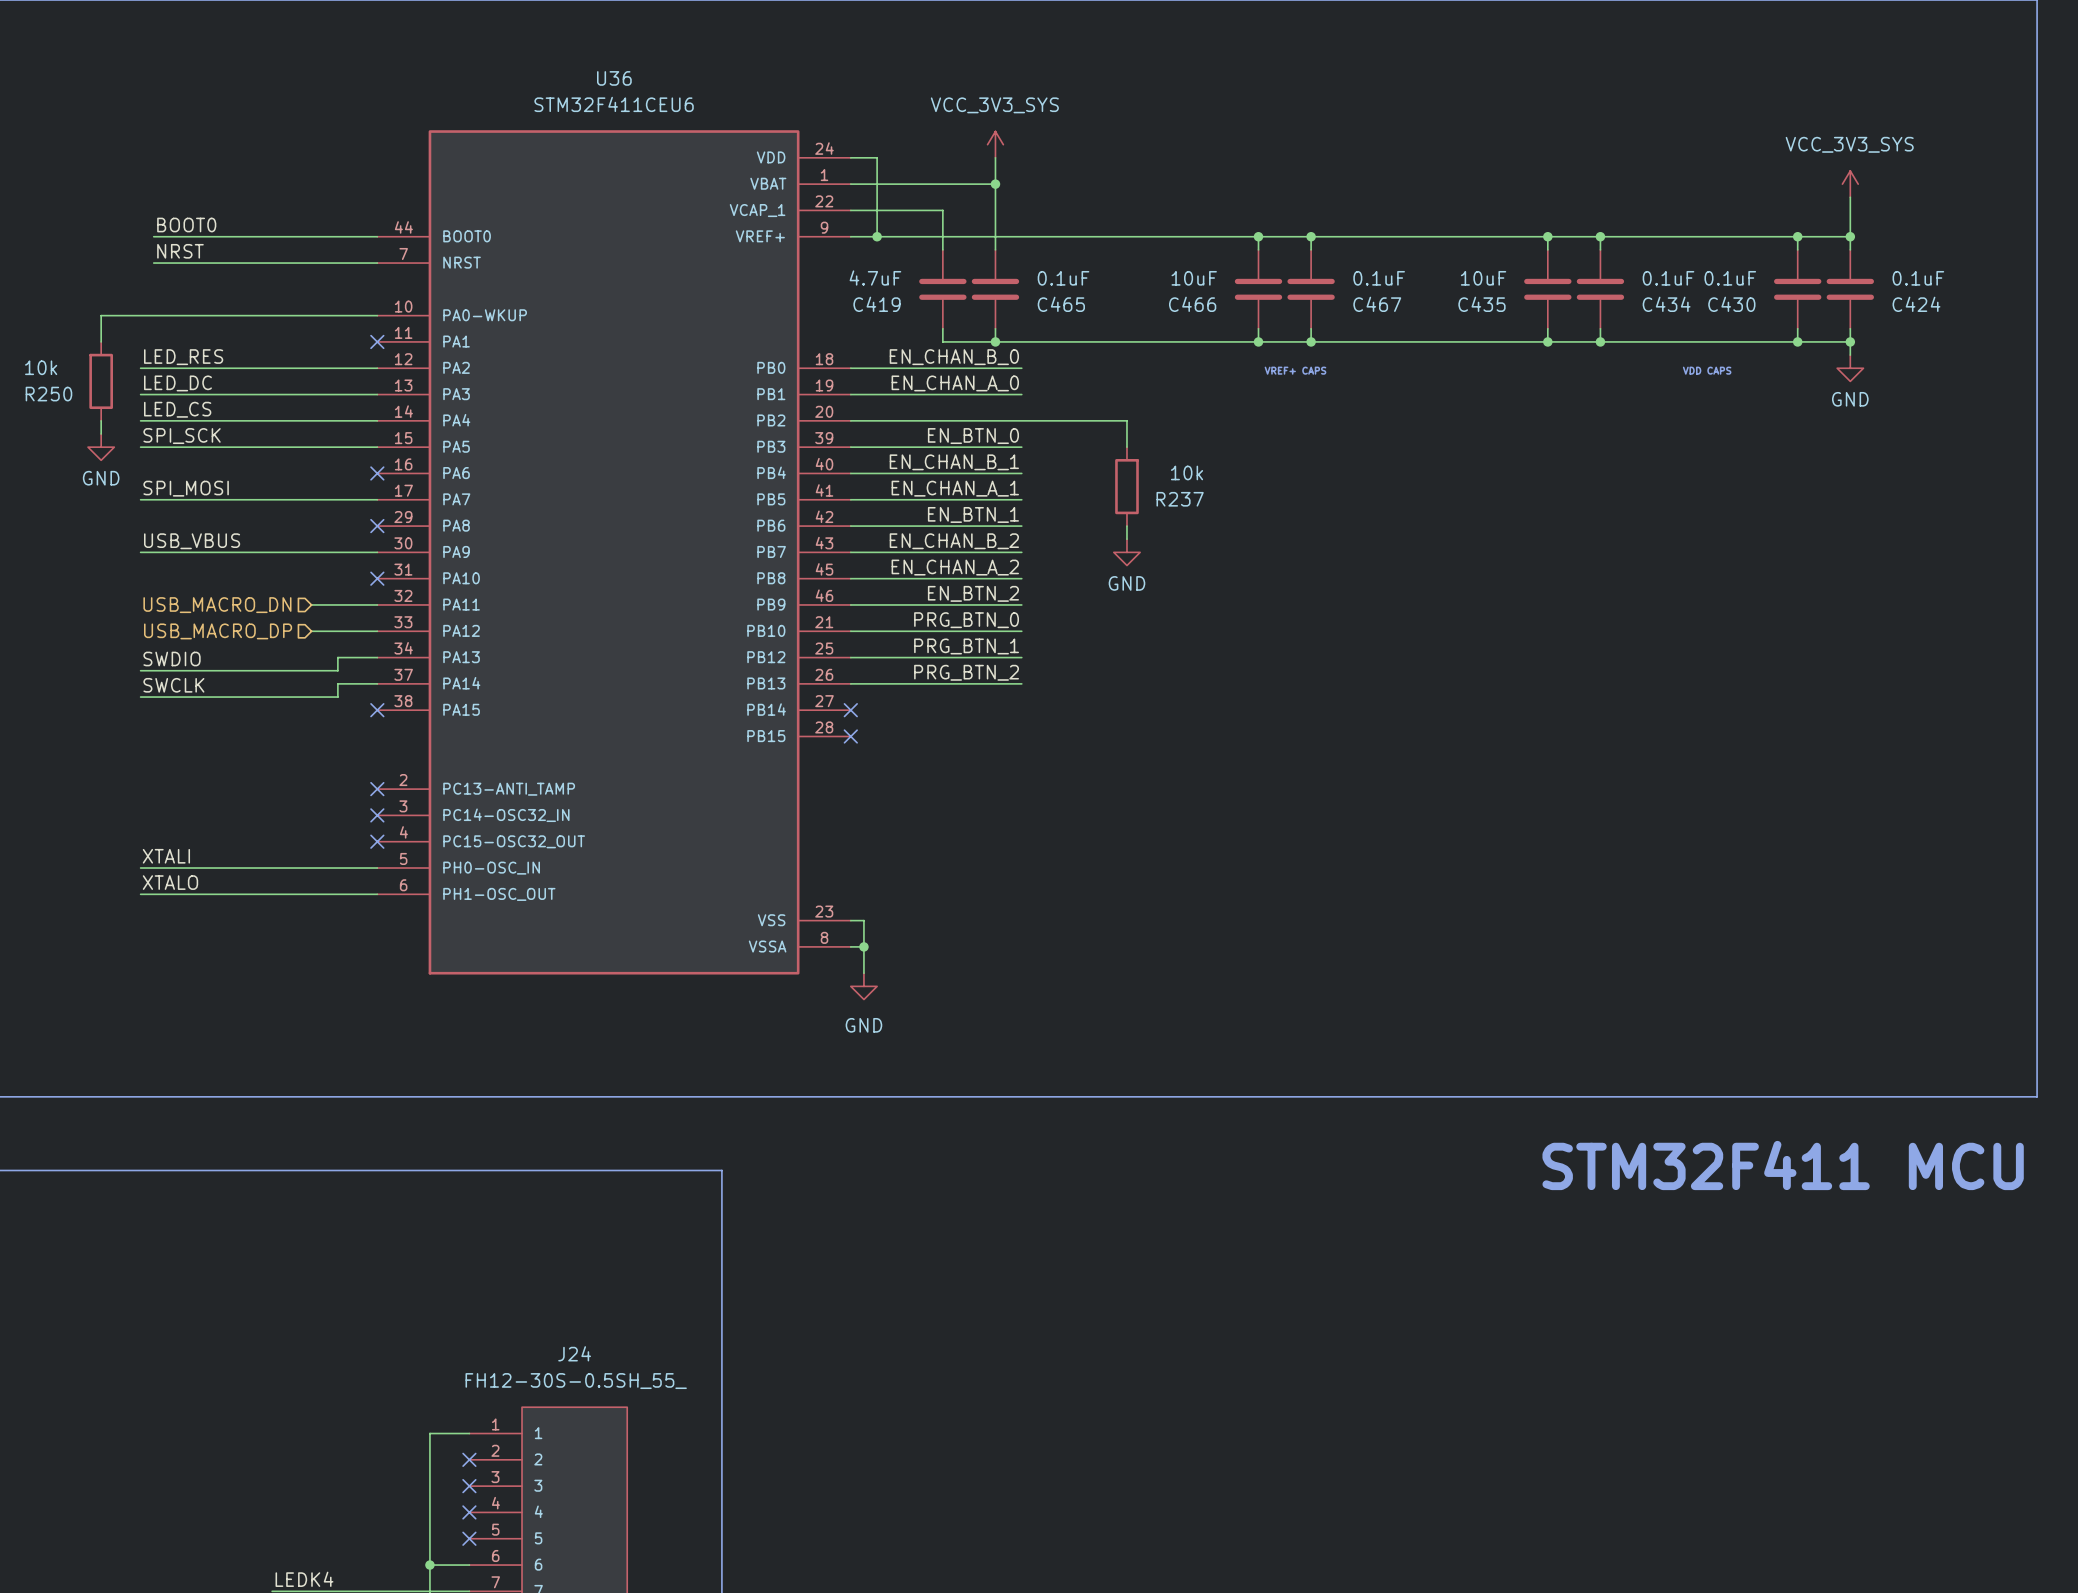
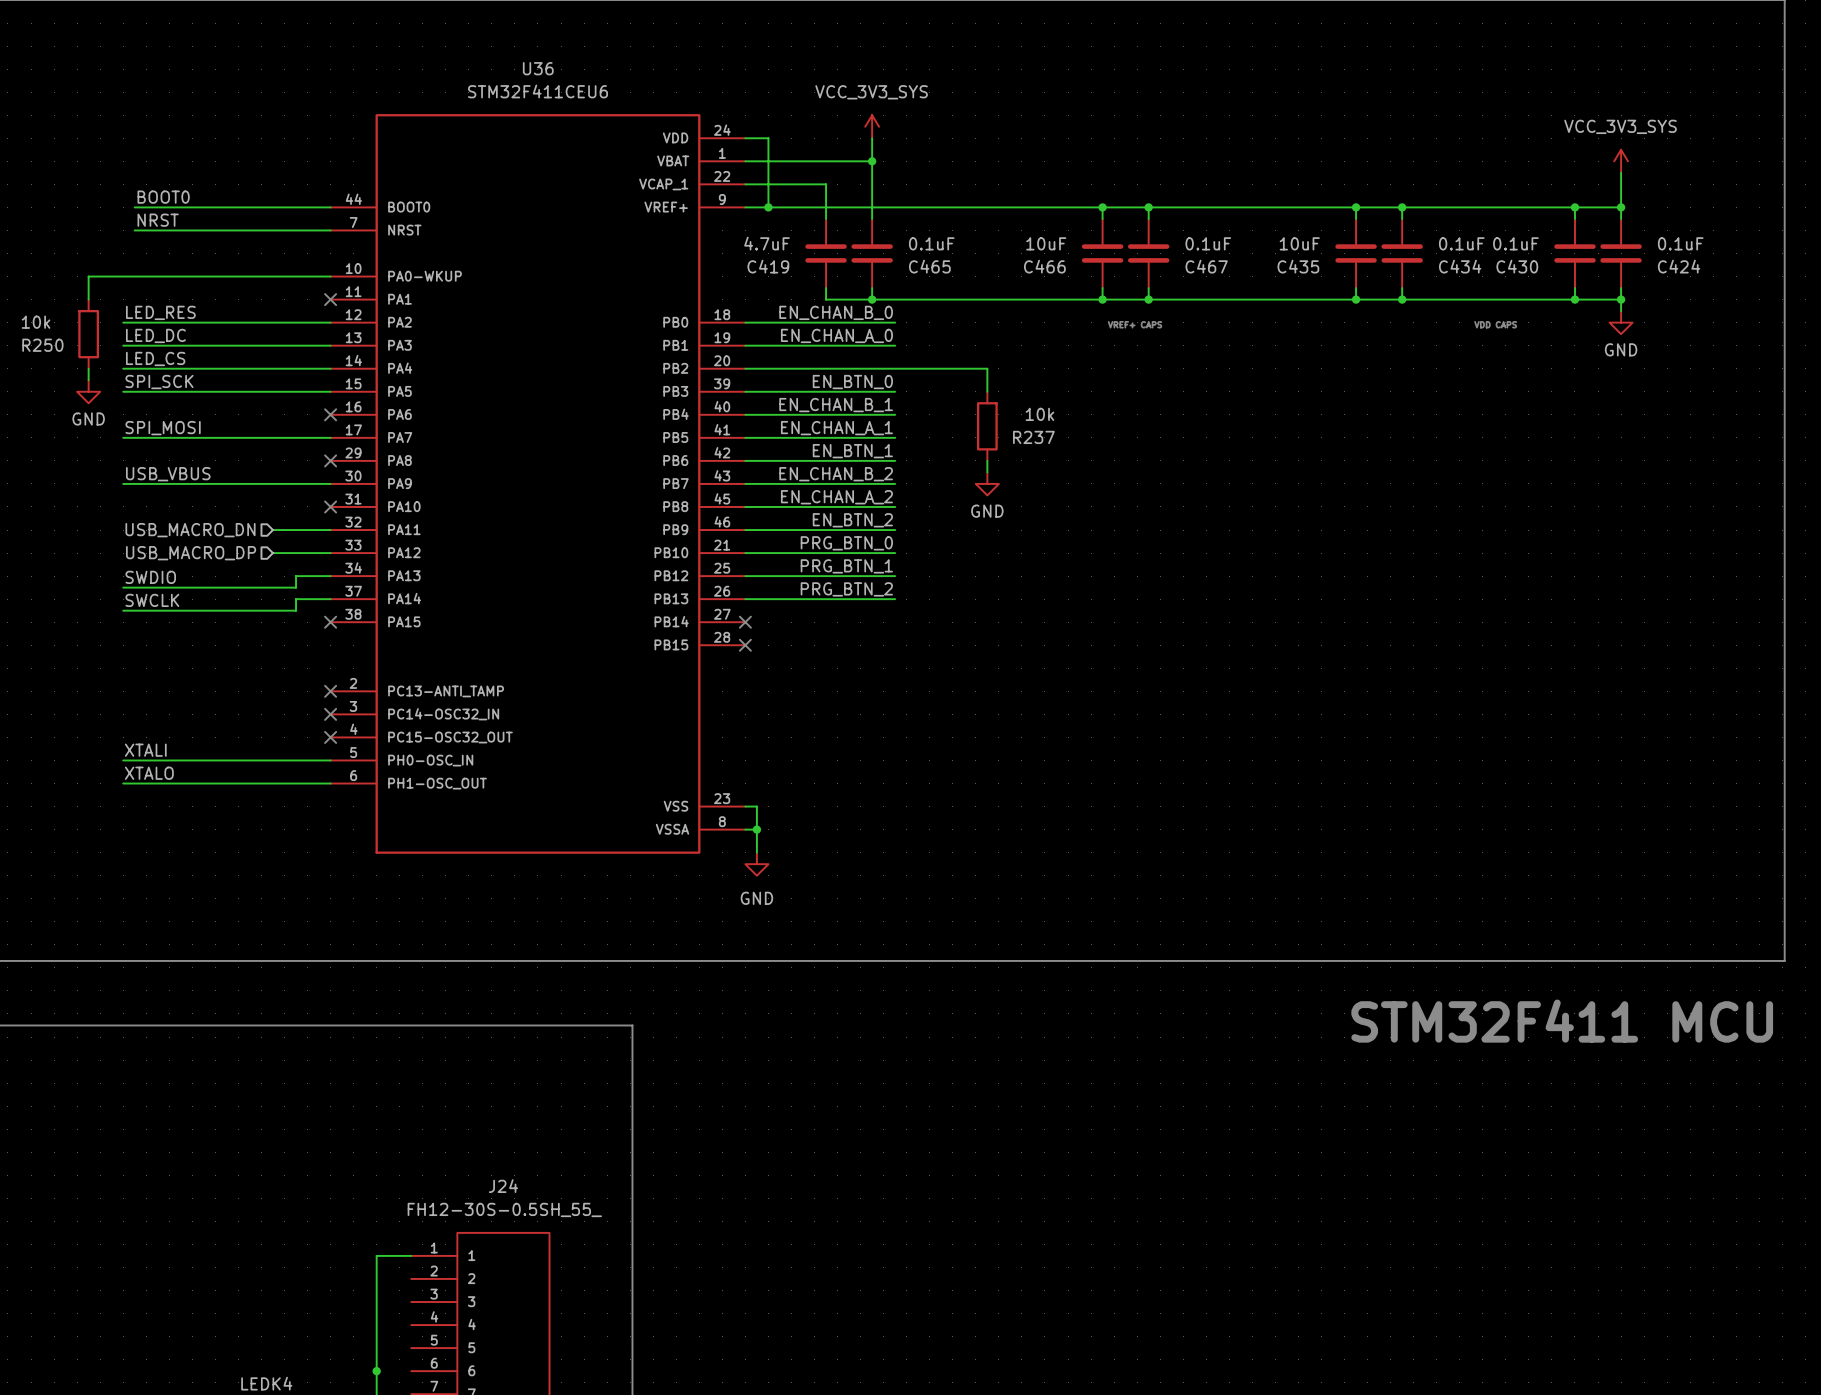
no-connect mark: (469, 1459) -> none
no-connect mark: (469, 1486) -> none
no-connect mark: (469, 1512) -> none
no-connect mark: (469, 1538) -> none
wire: (429, 1565) (469, 1565) -> none
wire: (272, 1591) (469, 1591) -> none

